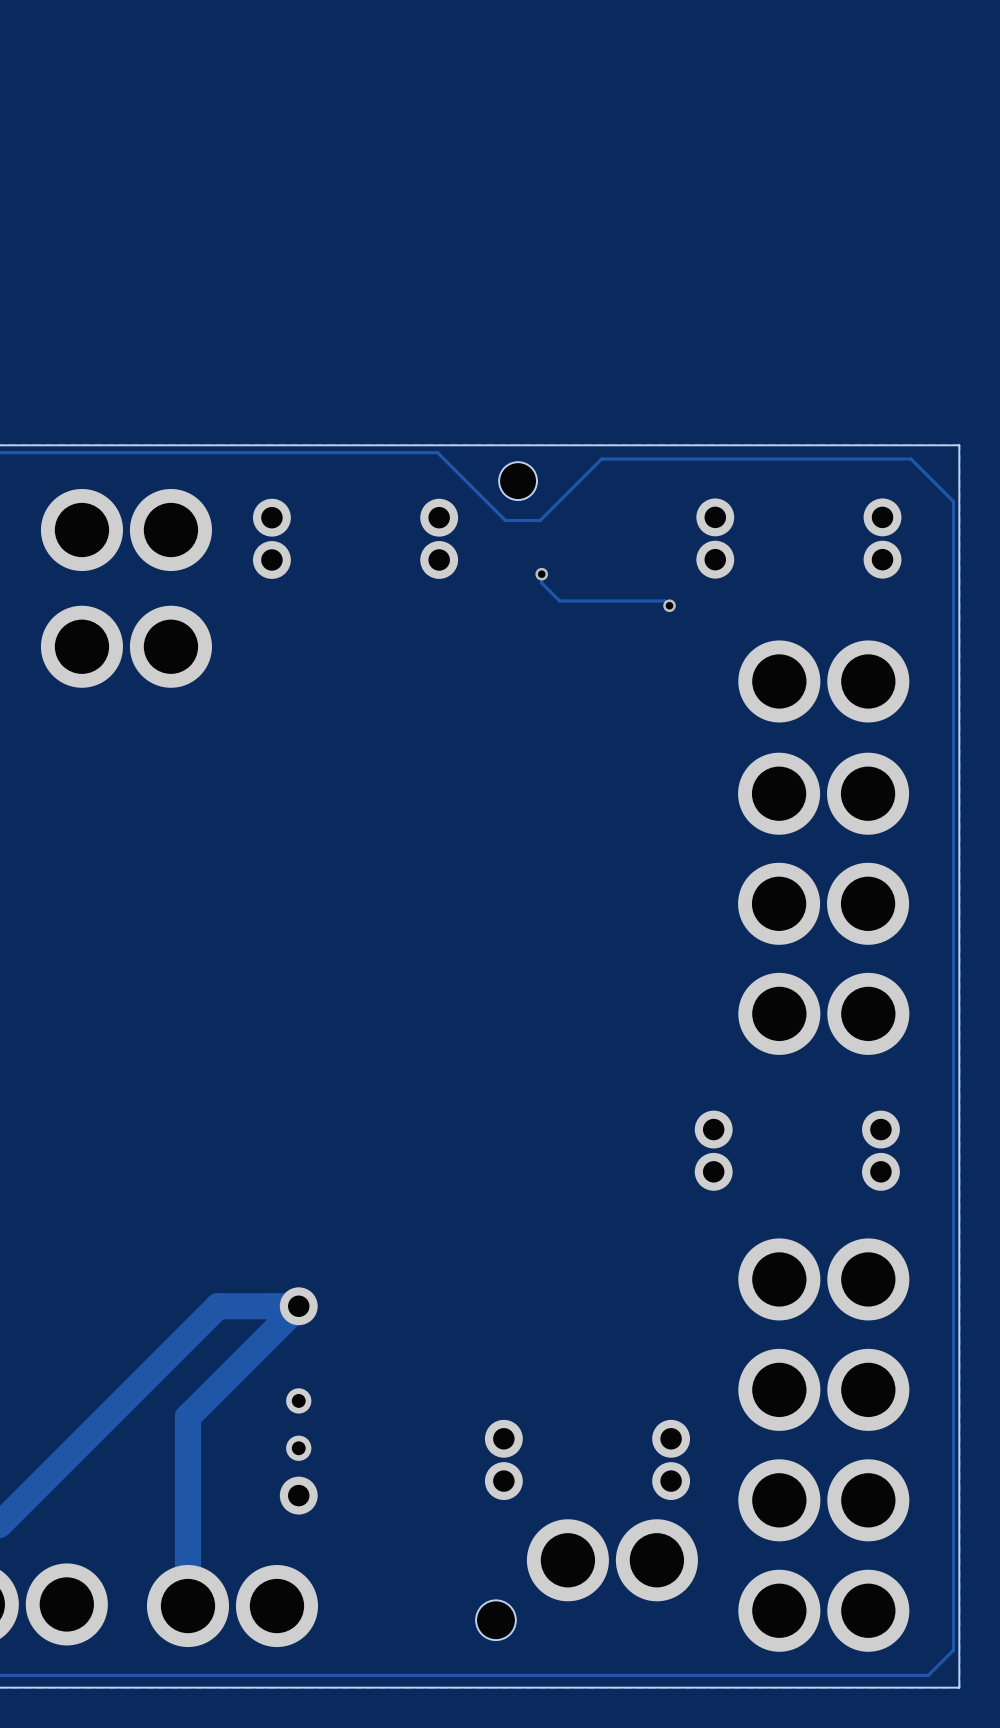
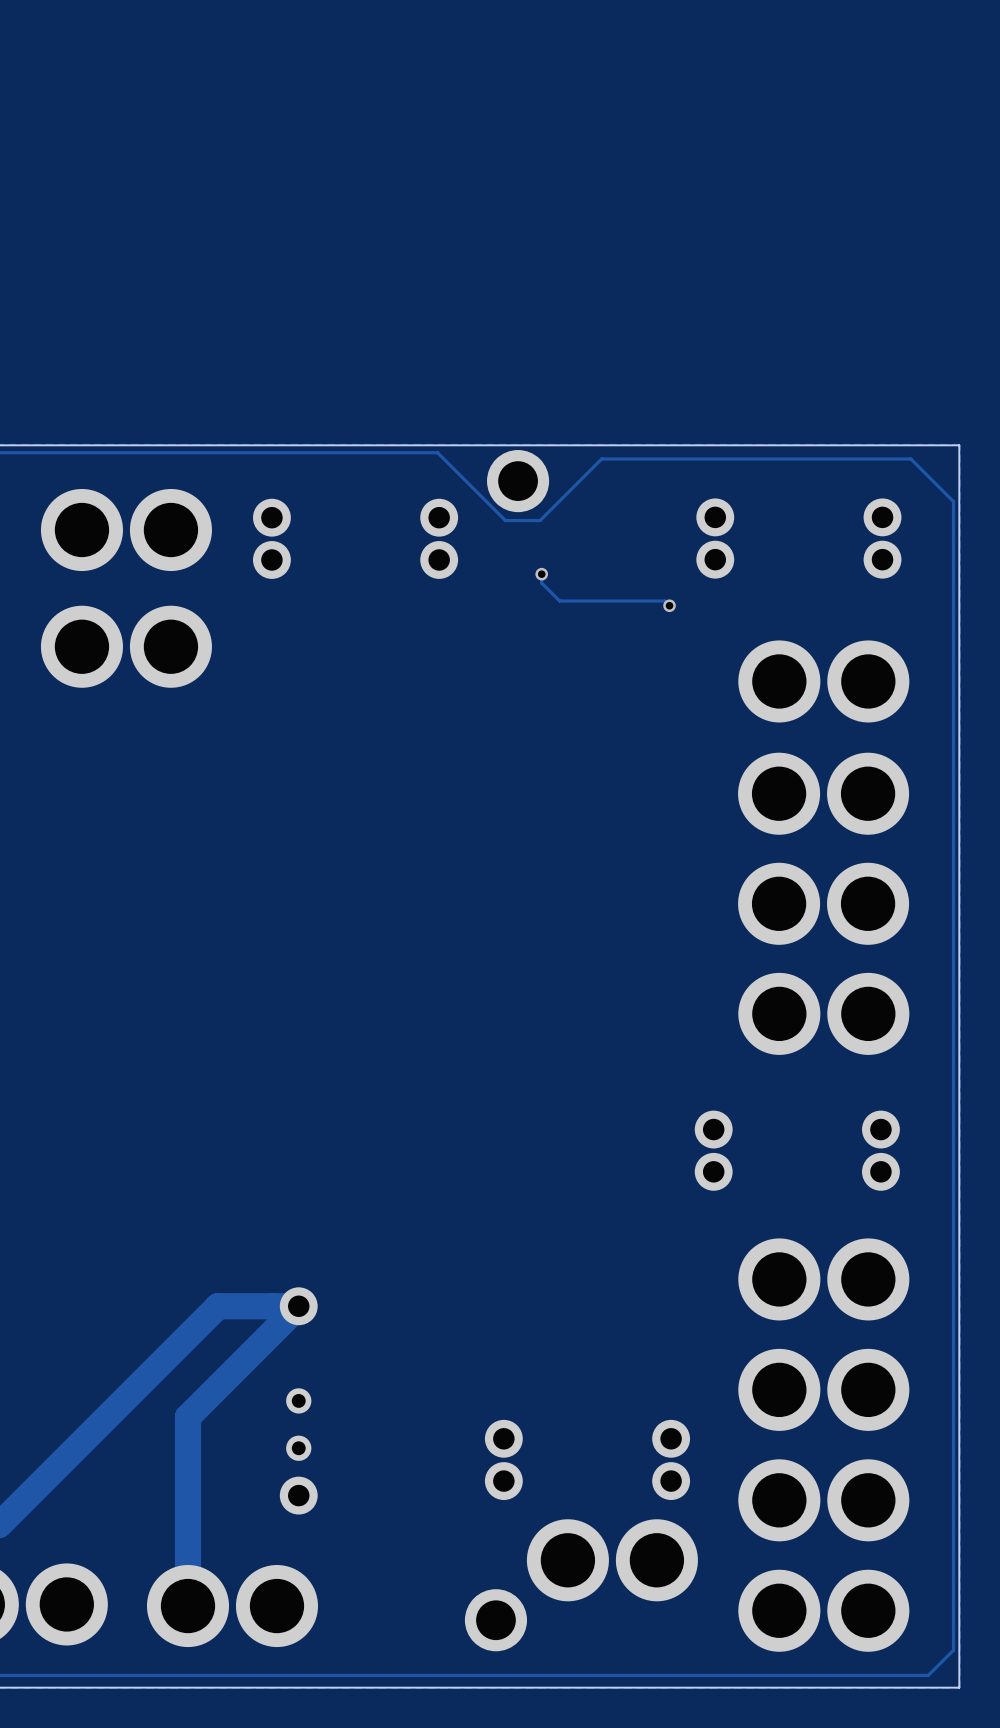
part footprint: [499, 462, 537, 501] -> [487, 450, 550, 513]
part footprint: [476, 1600, 516, 1641] -> [464, 1589, 528, 1652]

